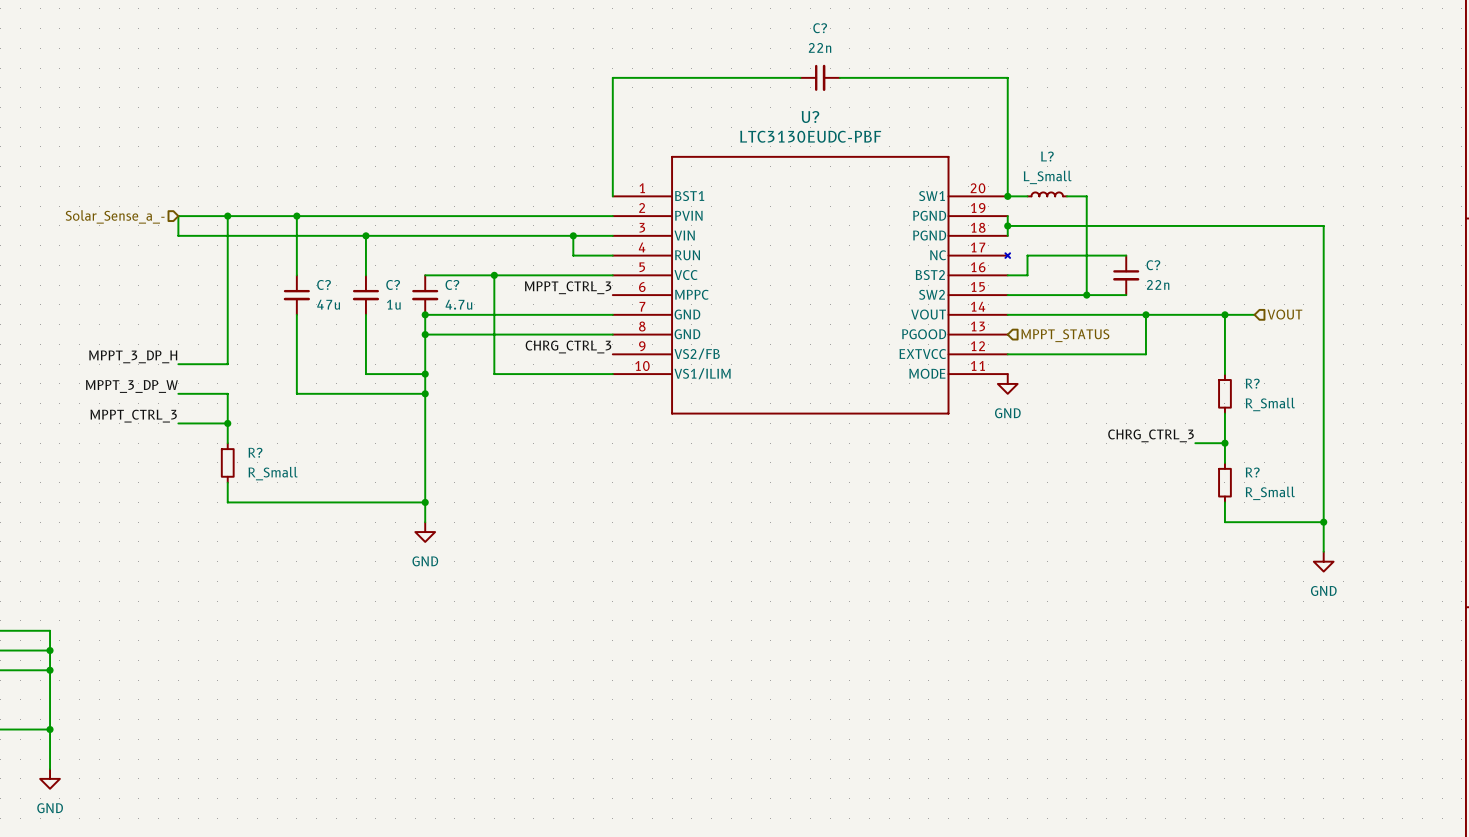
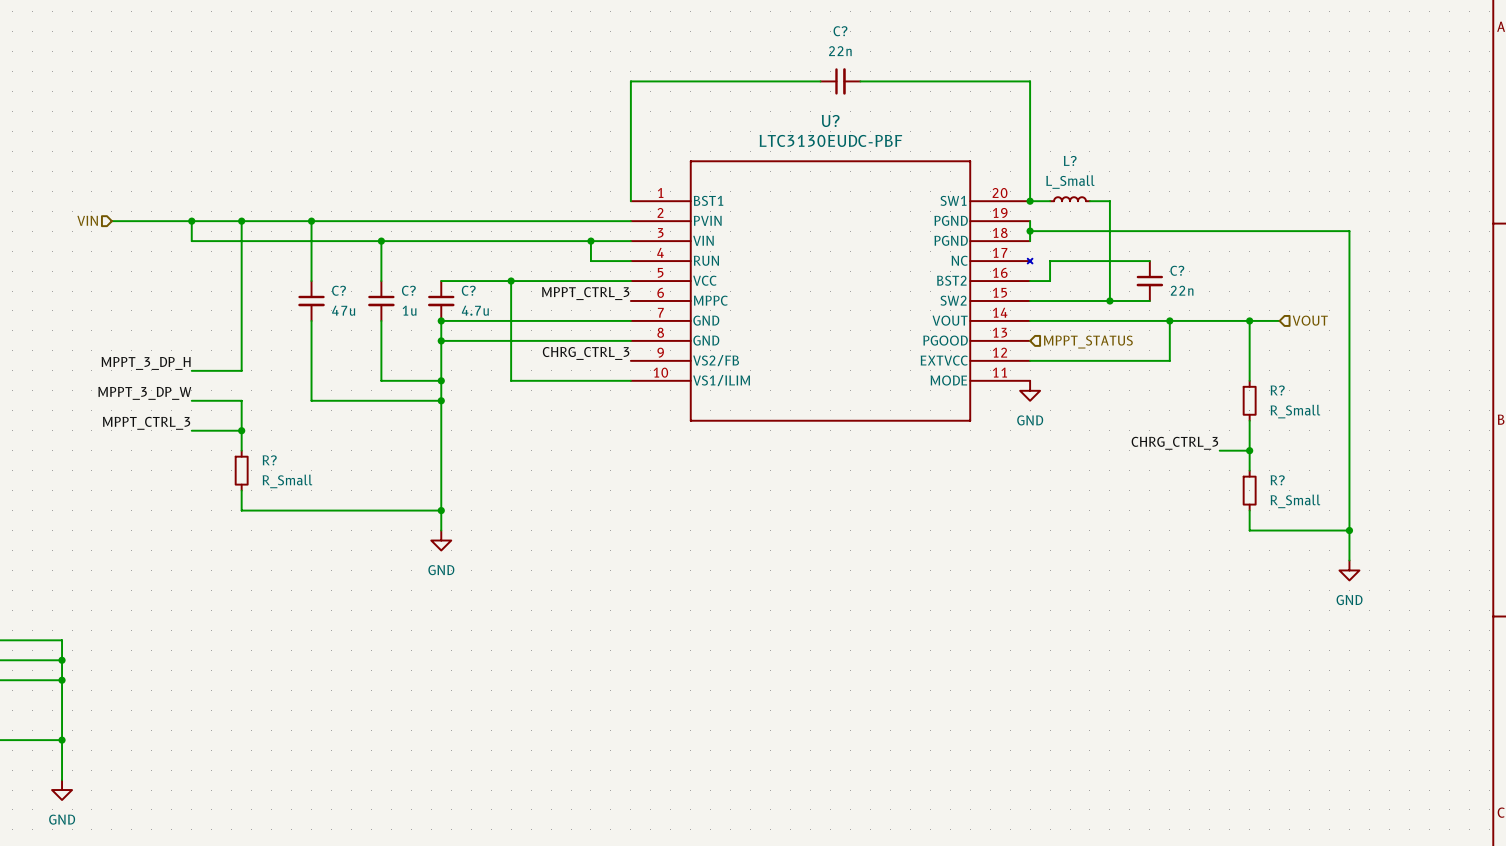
hierarchical label: none -> VIN (87, 220)
wire: none -> (111, 221) (191, 221)
hierarchical label: Solar_Sense_a_- (115, 216) -> none
junction: none -> (191, 221)

